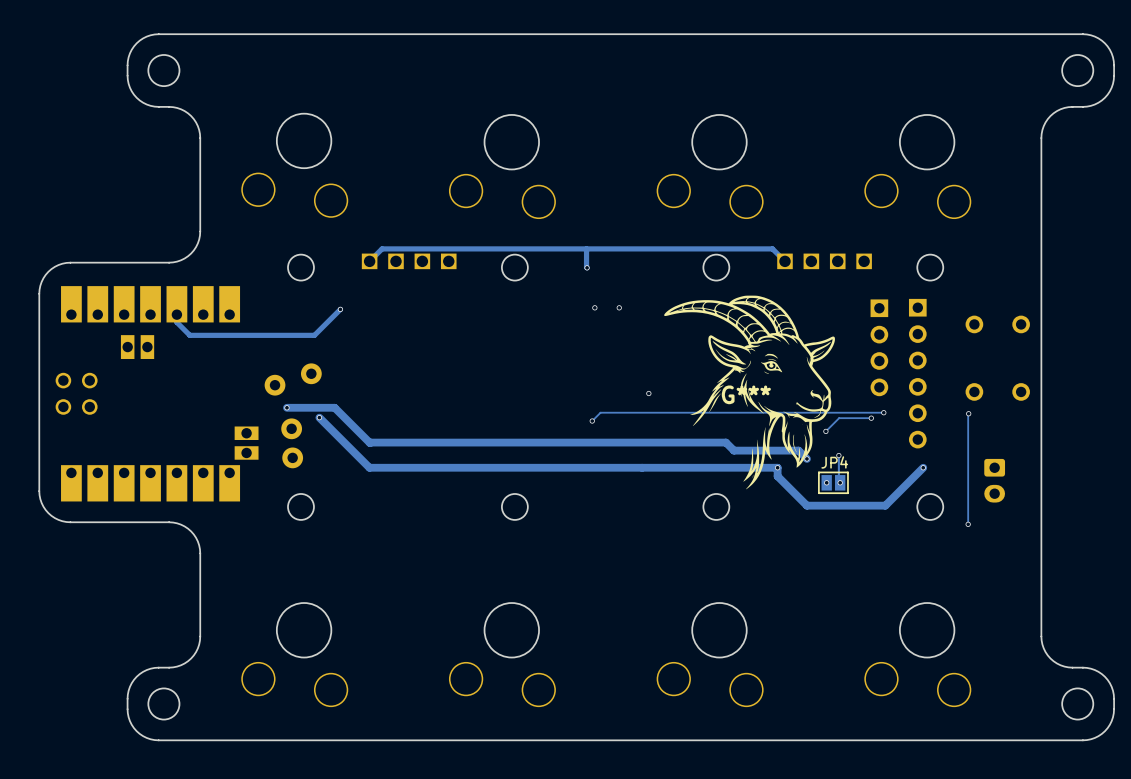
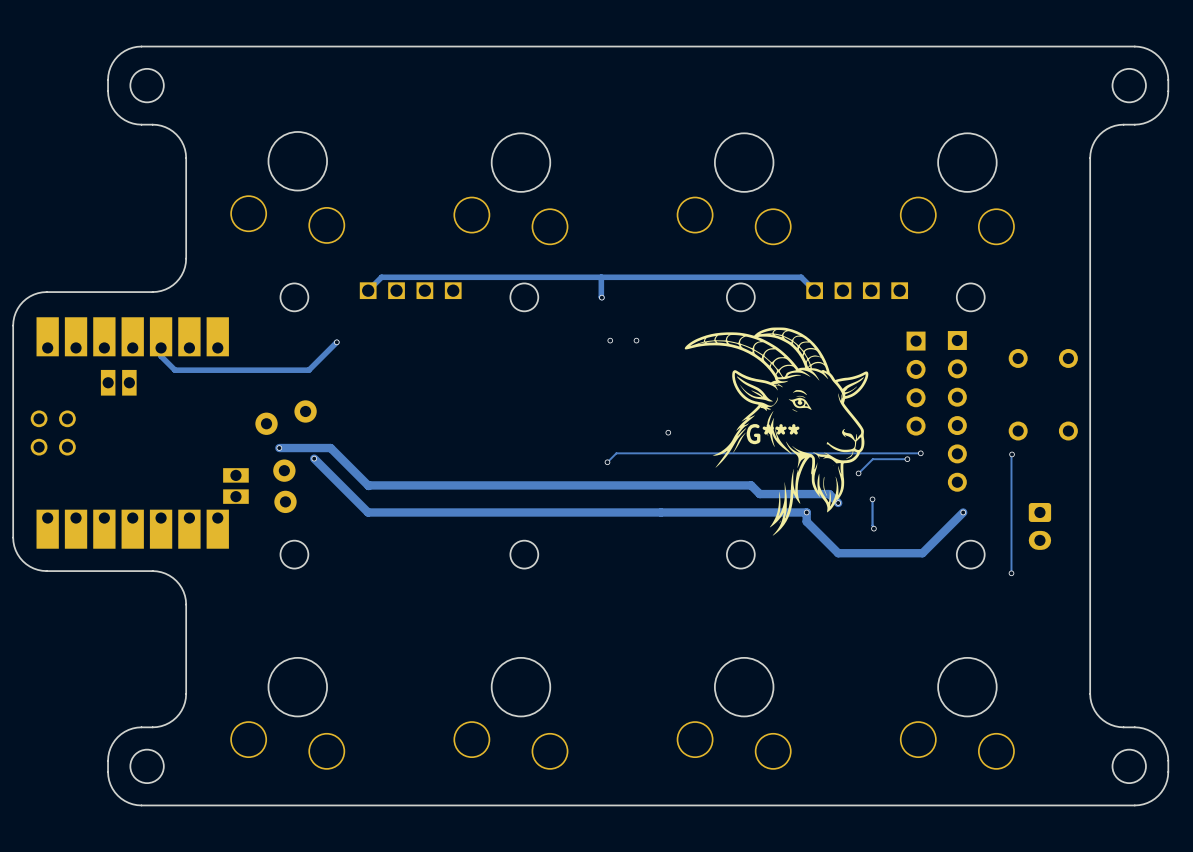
via: (826, 482) -> none
JP4: (833, 482) -> none

